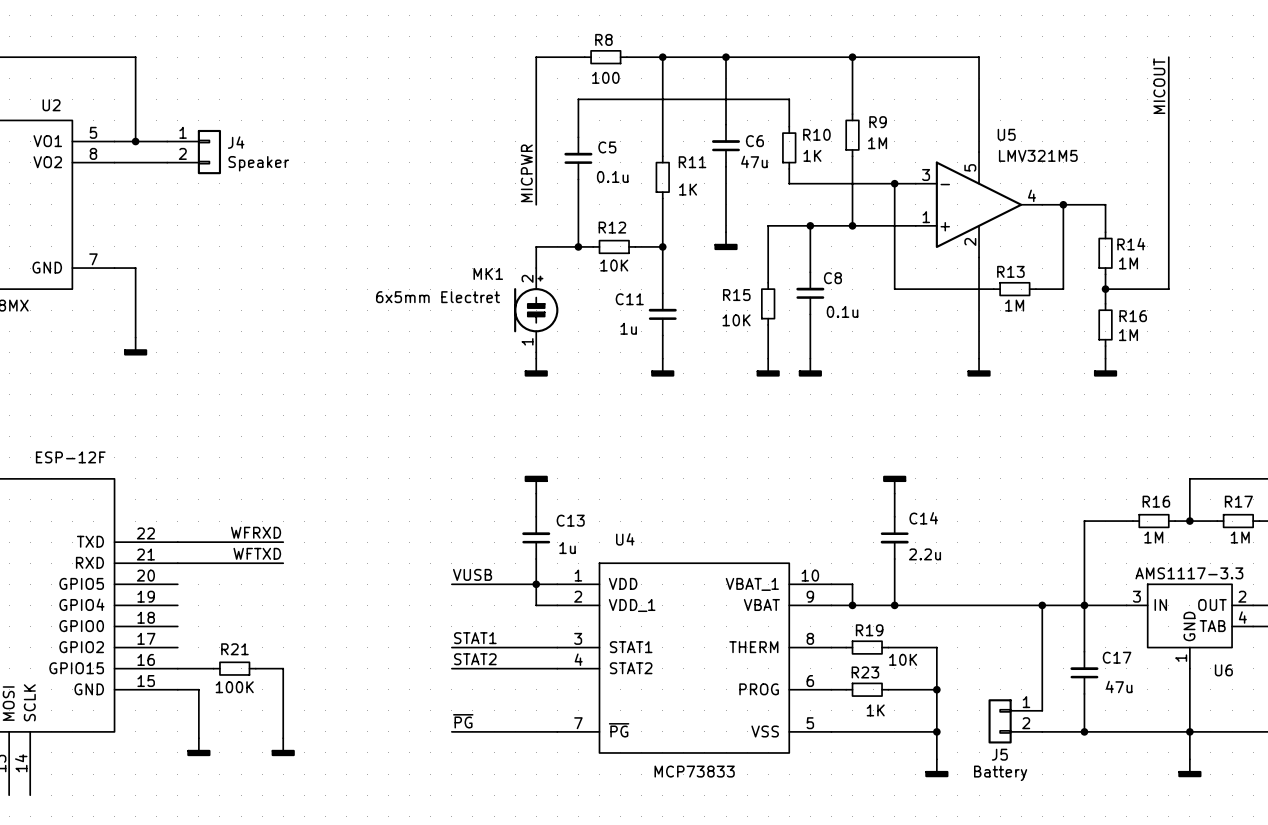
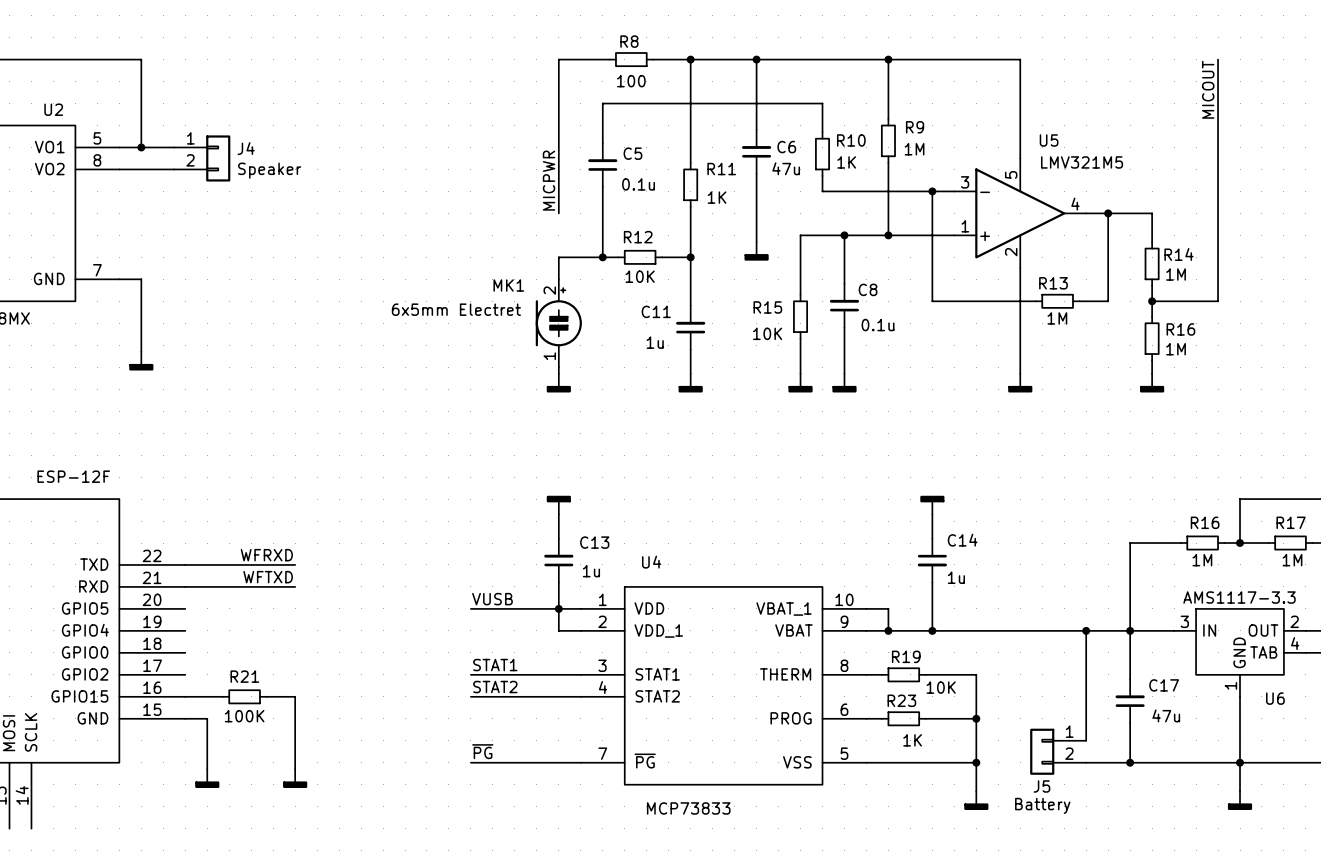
C14 value: 2.2u (924, 554) -> 1u (956, 577)
U4 value position: MCP73833 (694, 771) -> MCP73833 (688, 808)

